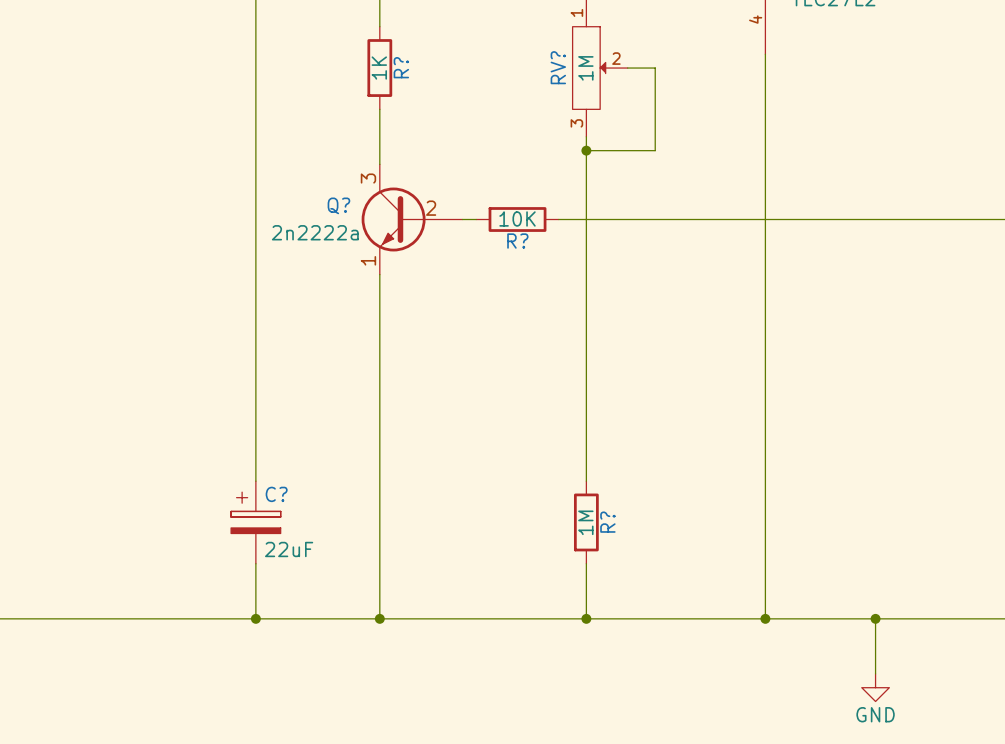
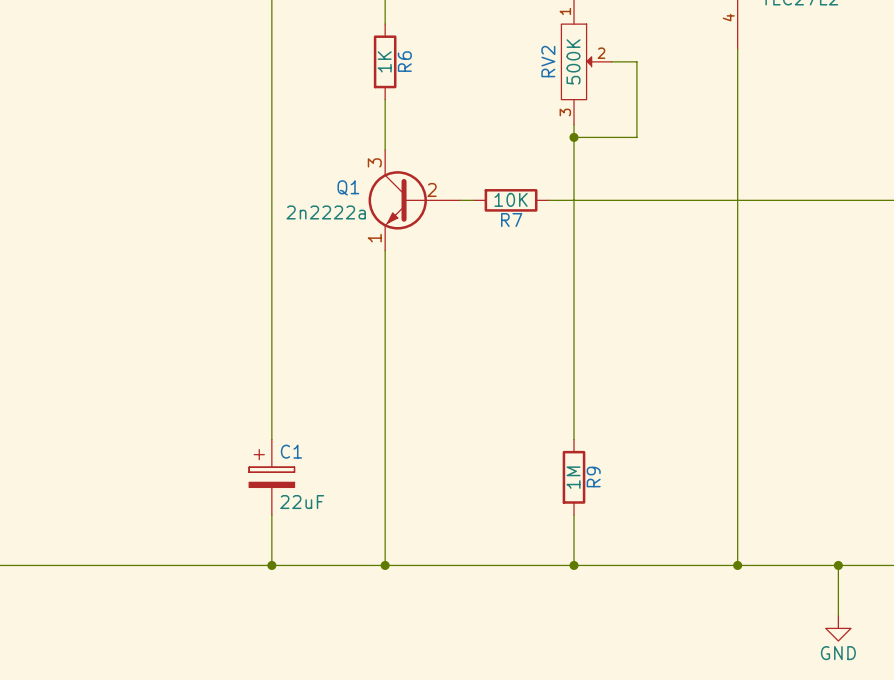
R? name: R? (401, 67) -> R6 (404, 61)
RV? name: RV? (558, 67) -> RV2 (548, 61)
RV? value: 1M (585, 68) -> 500K (573, 61)
Q? name: Q? (338, 205) -> Q1 (348, 187)
R? name: R? (517, 241) -> R7 (511, 220)
C? name: C? (276, 494) -> C1 (291, 451)
R? name: R? (607, 522) -> R9 (593, 477)

